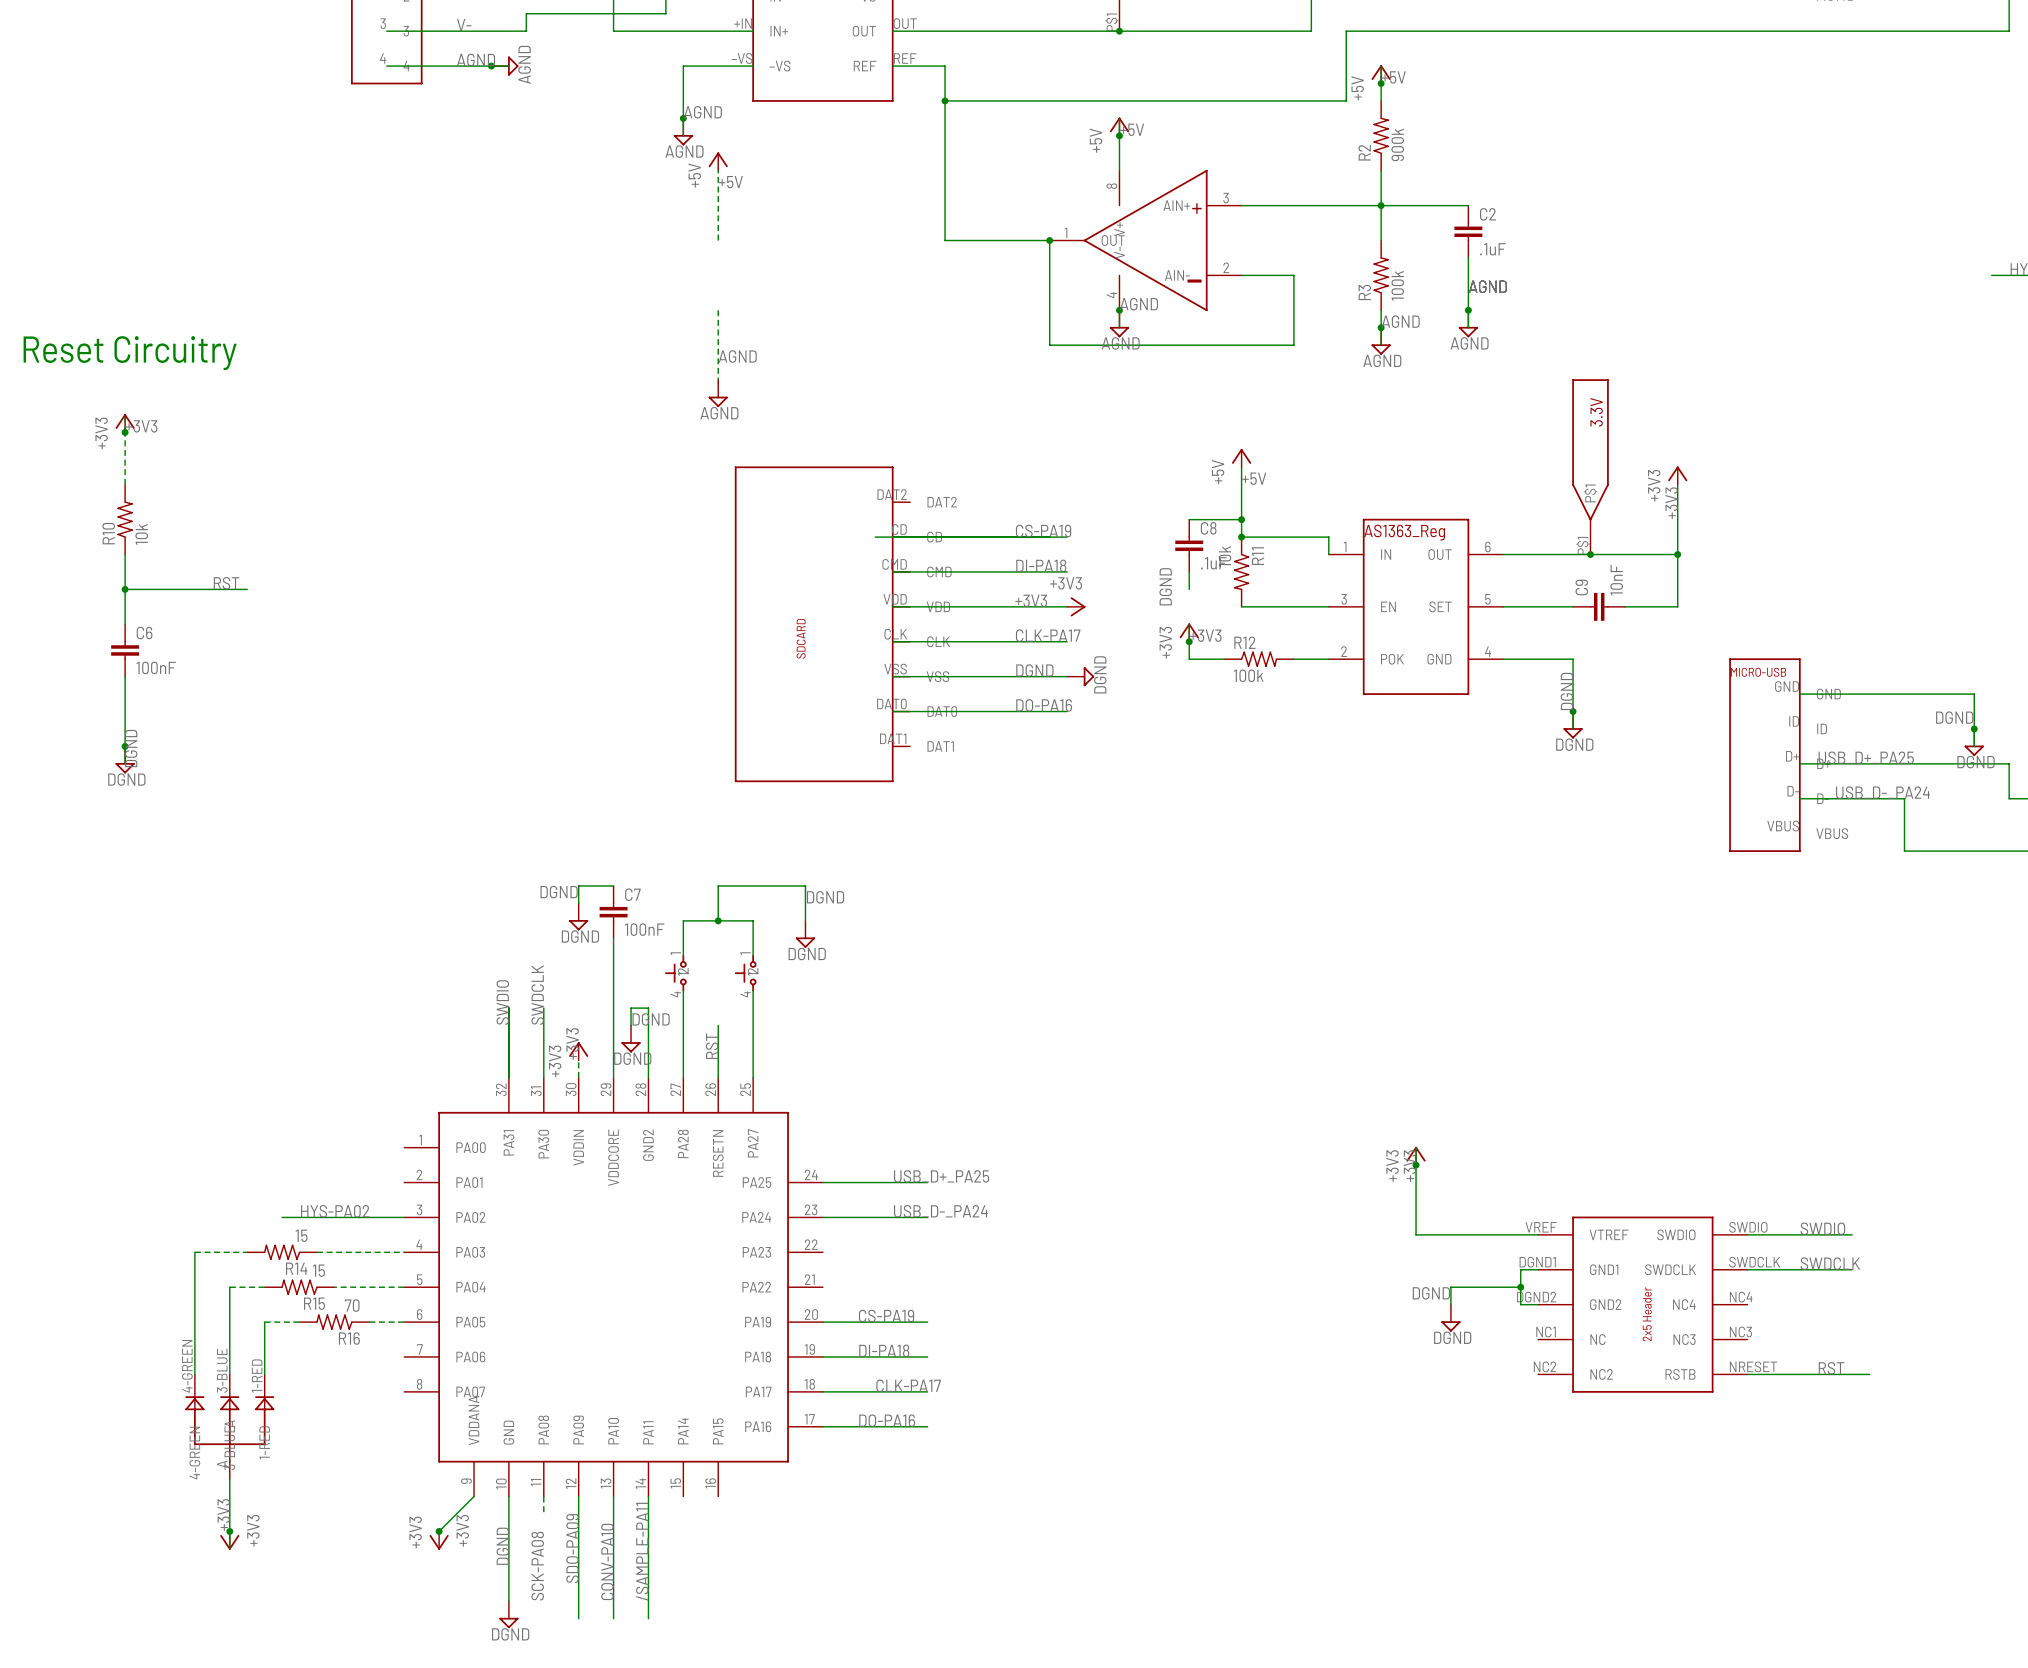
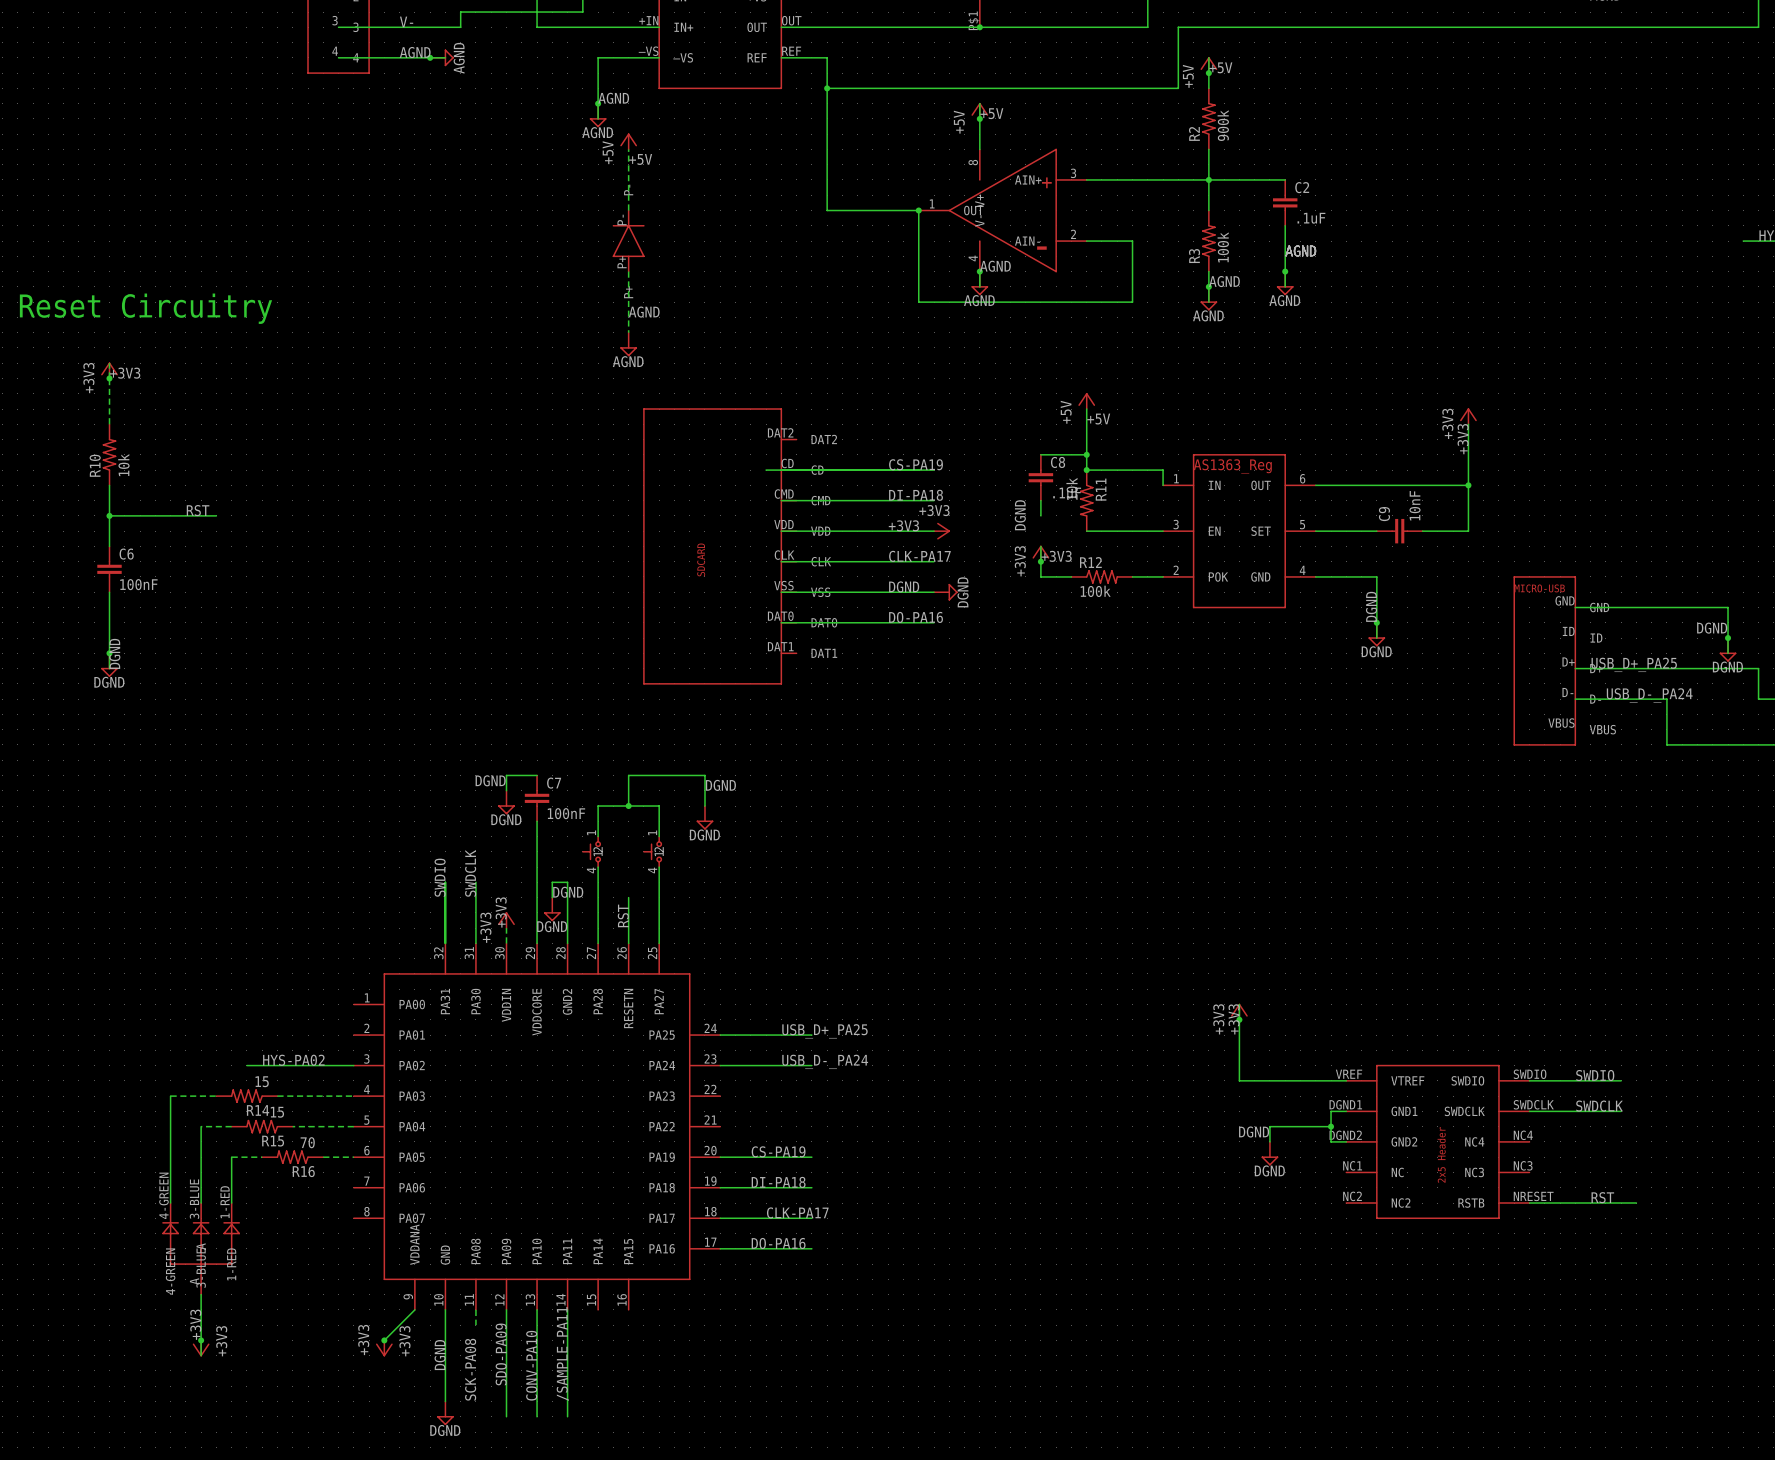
part: none -> (628, 241)
3.3V: (1590, 466) -> none
junction: (1590, 554) -> none

